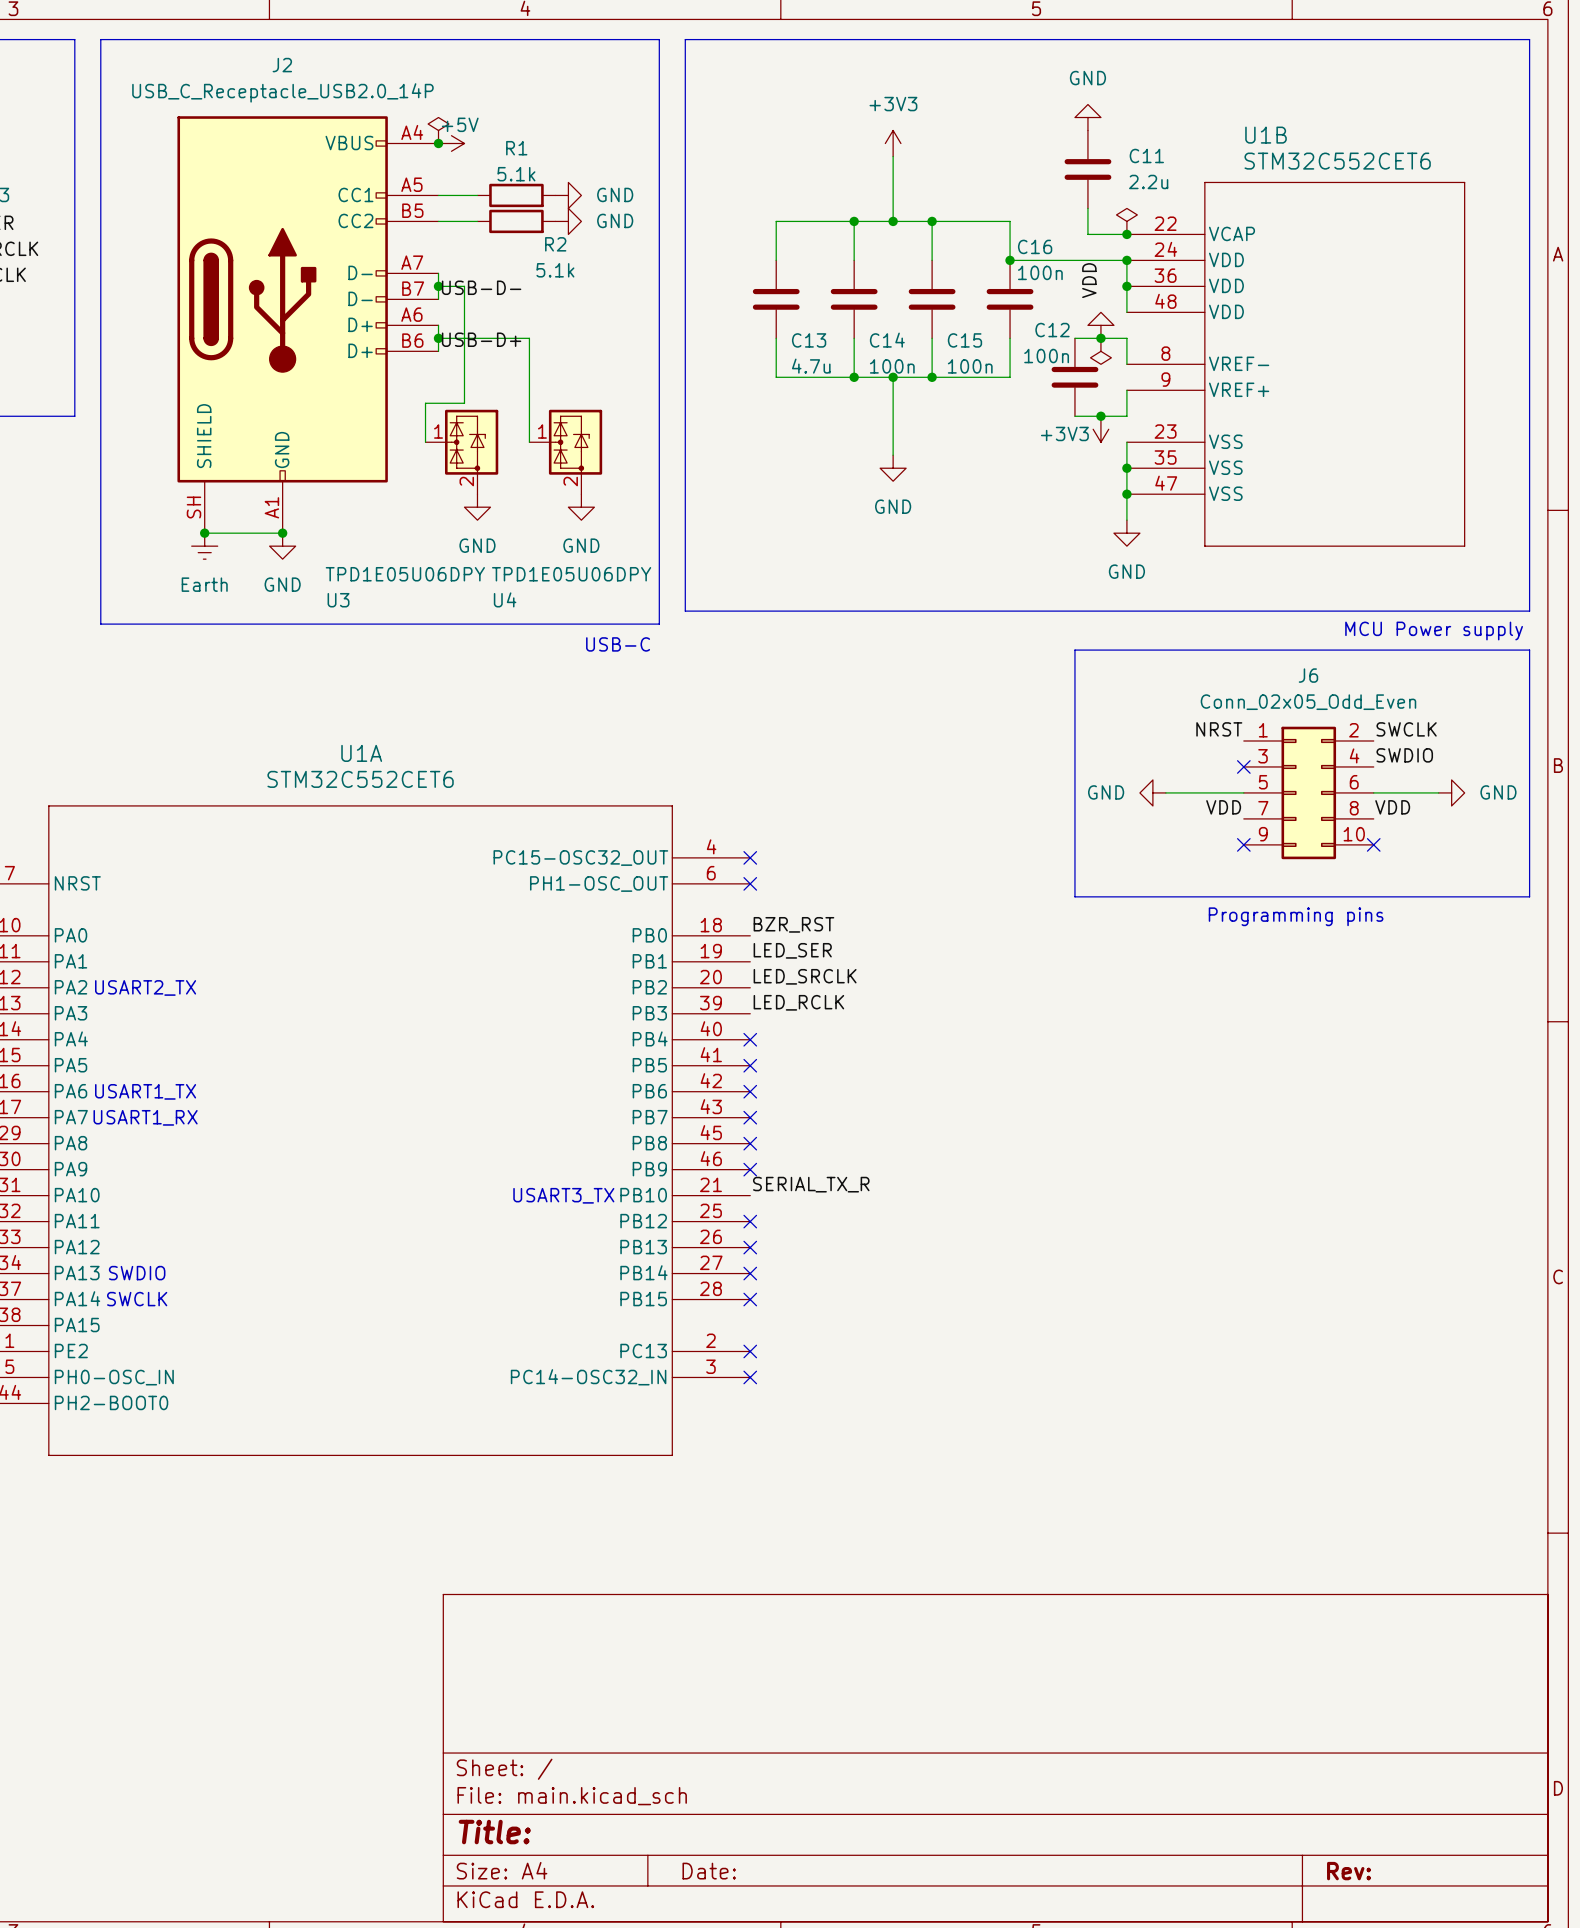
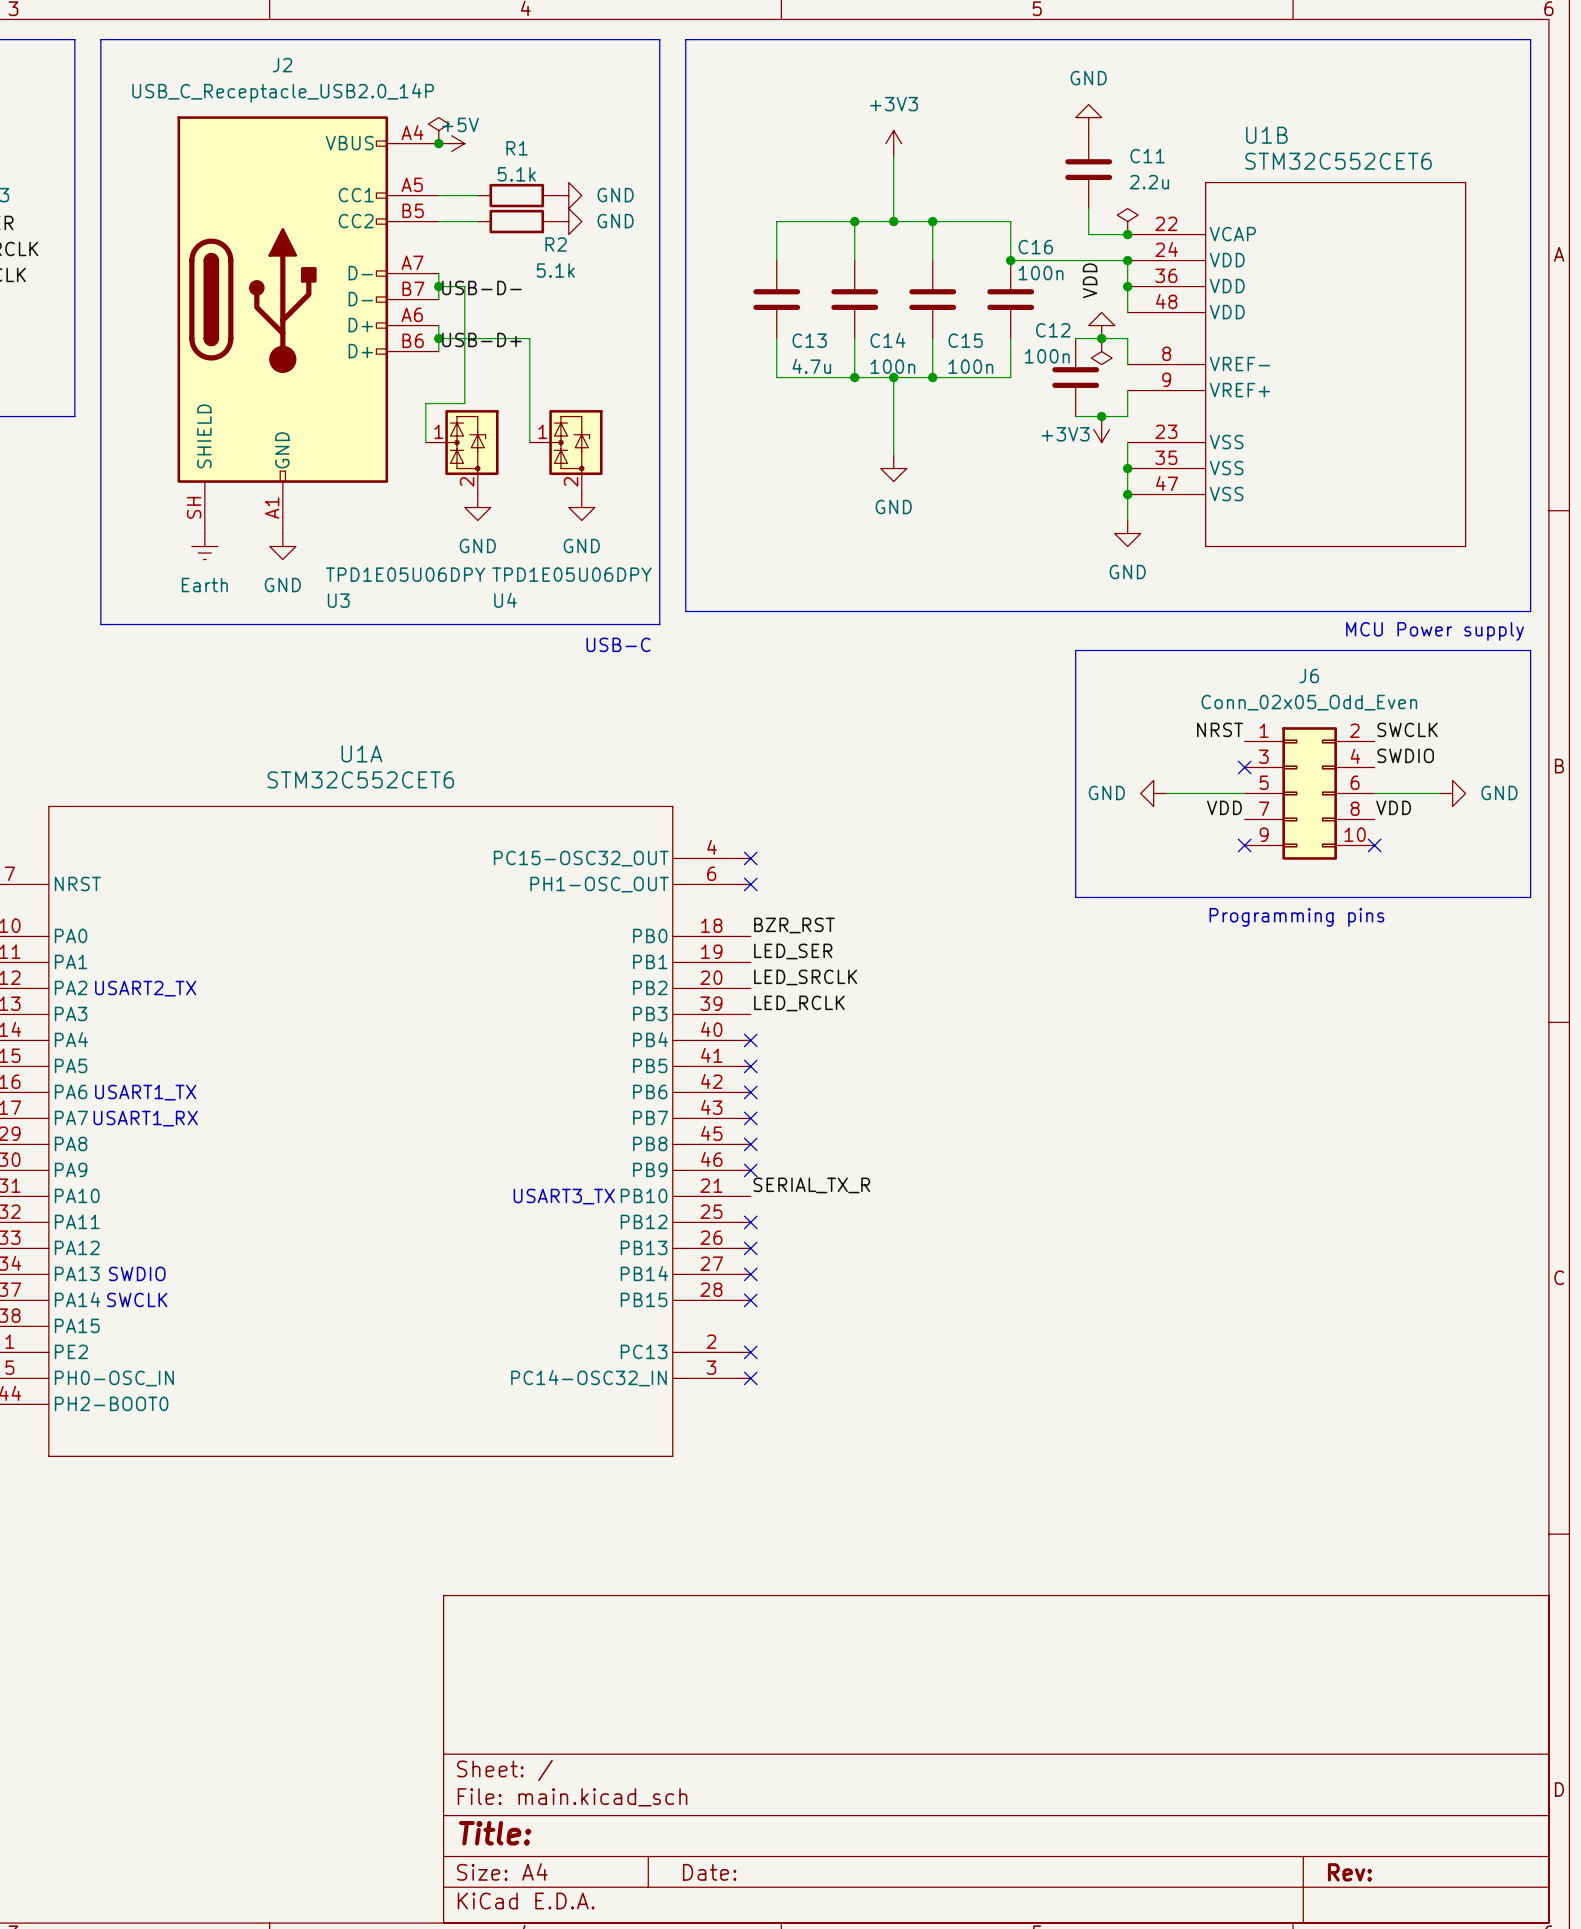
wire: (204, 533) (282, 533) -> none
junction: (204, 533) -> none
junction: (282, 533) -> none

